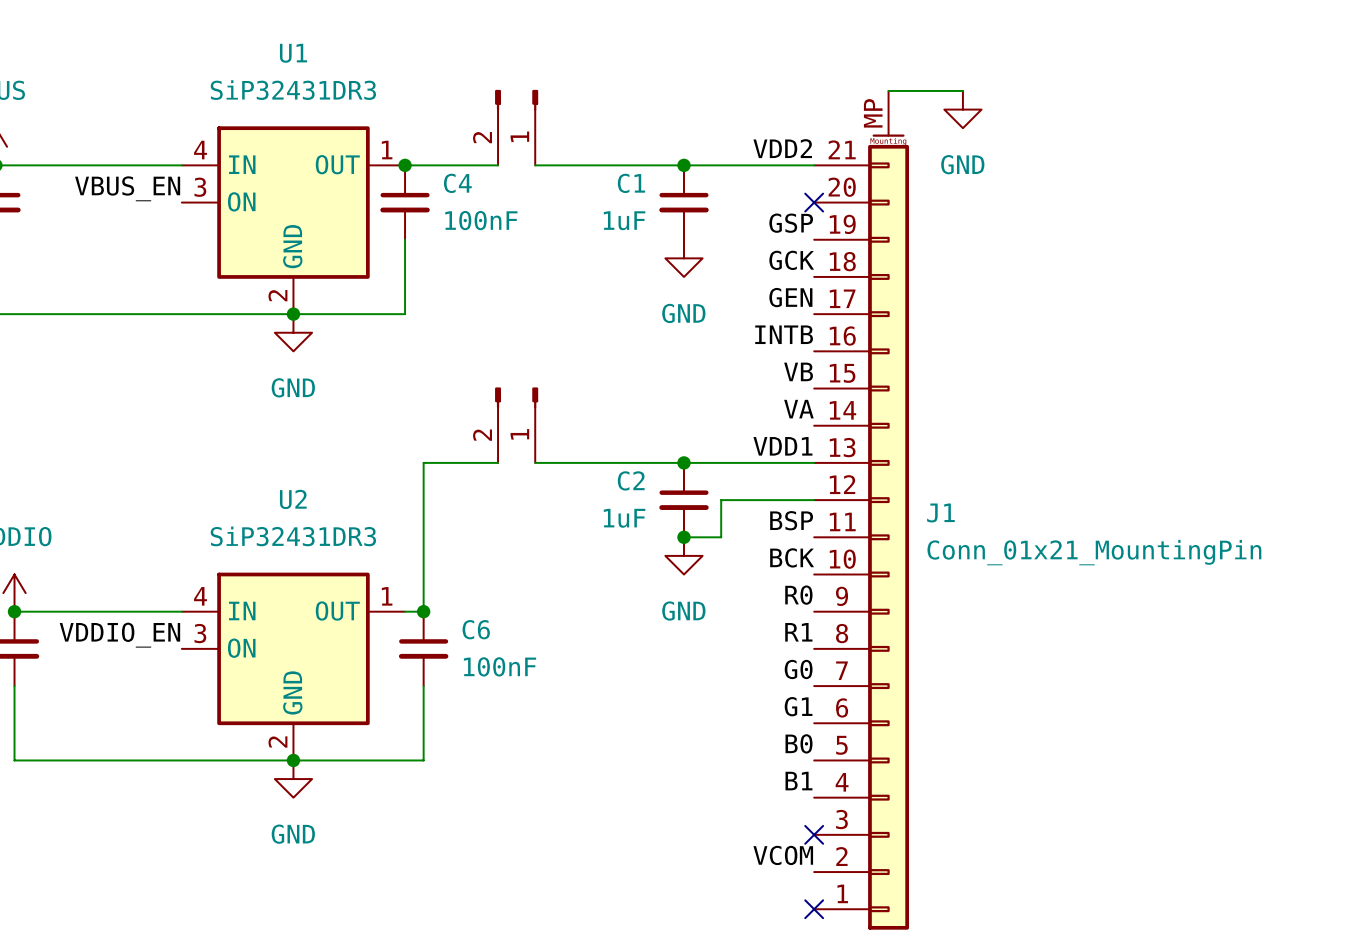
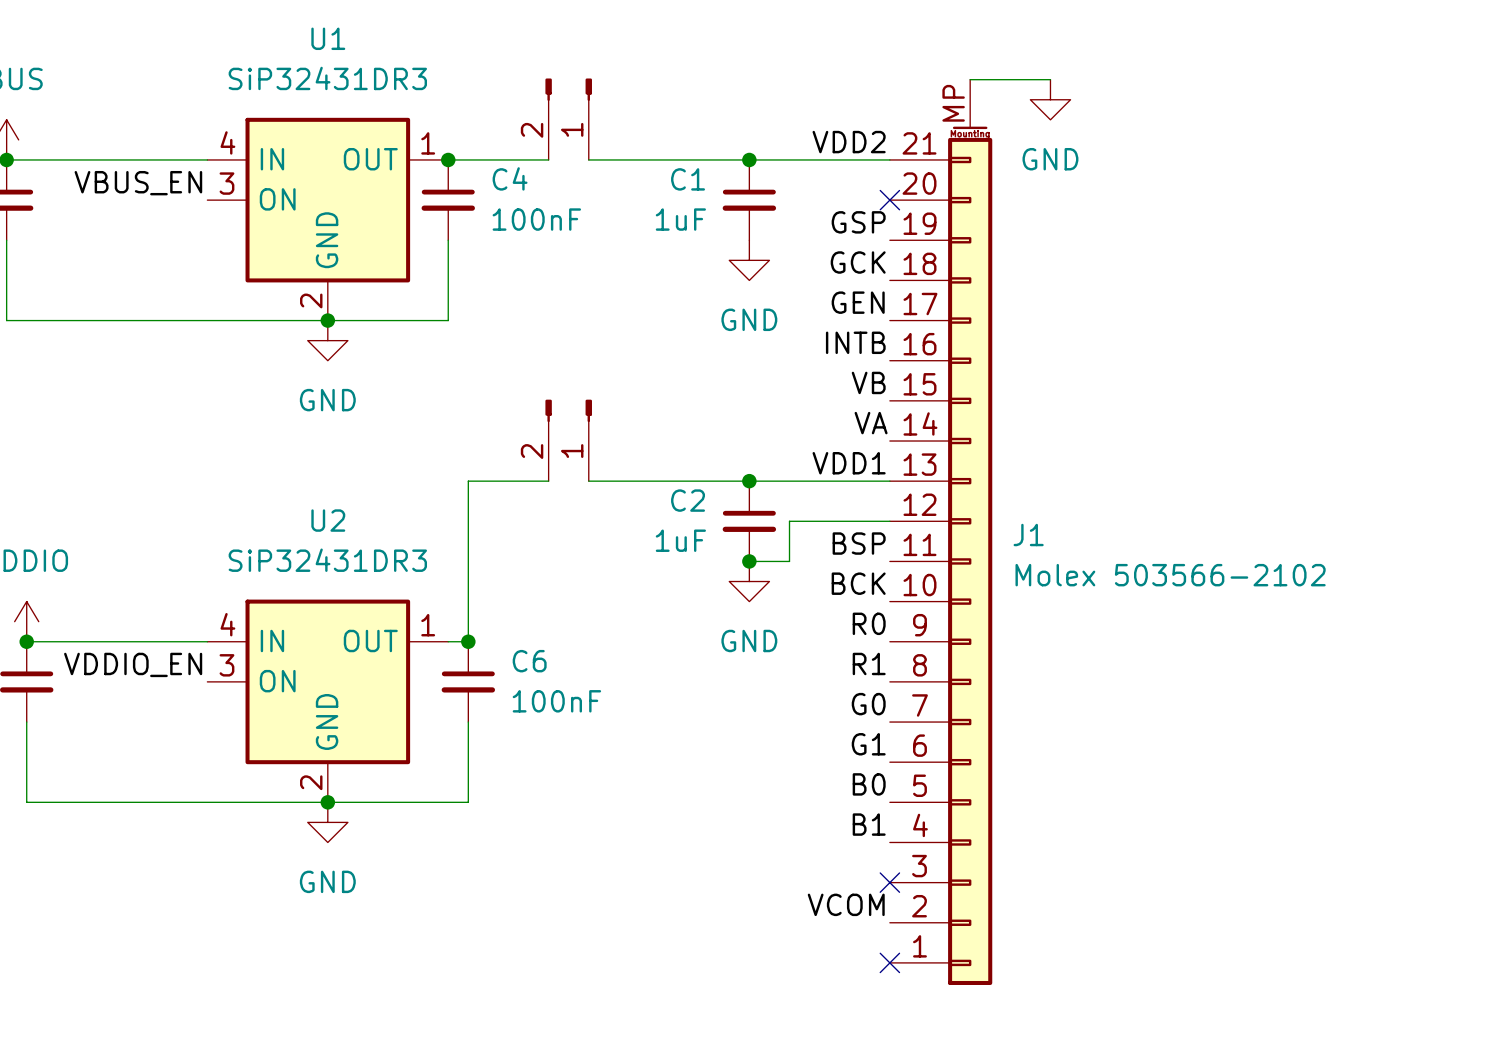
J1 value: Conn_01x21_MountingPin (1094, 552) -> Molex 503566-2102 (1170, 575)

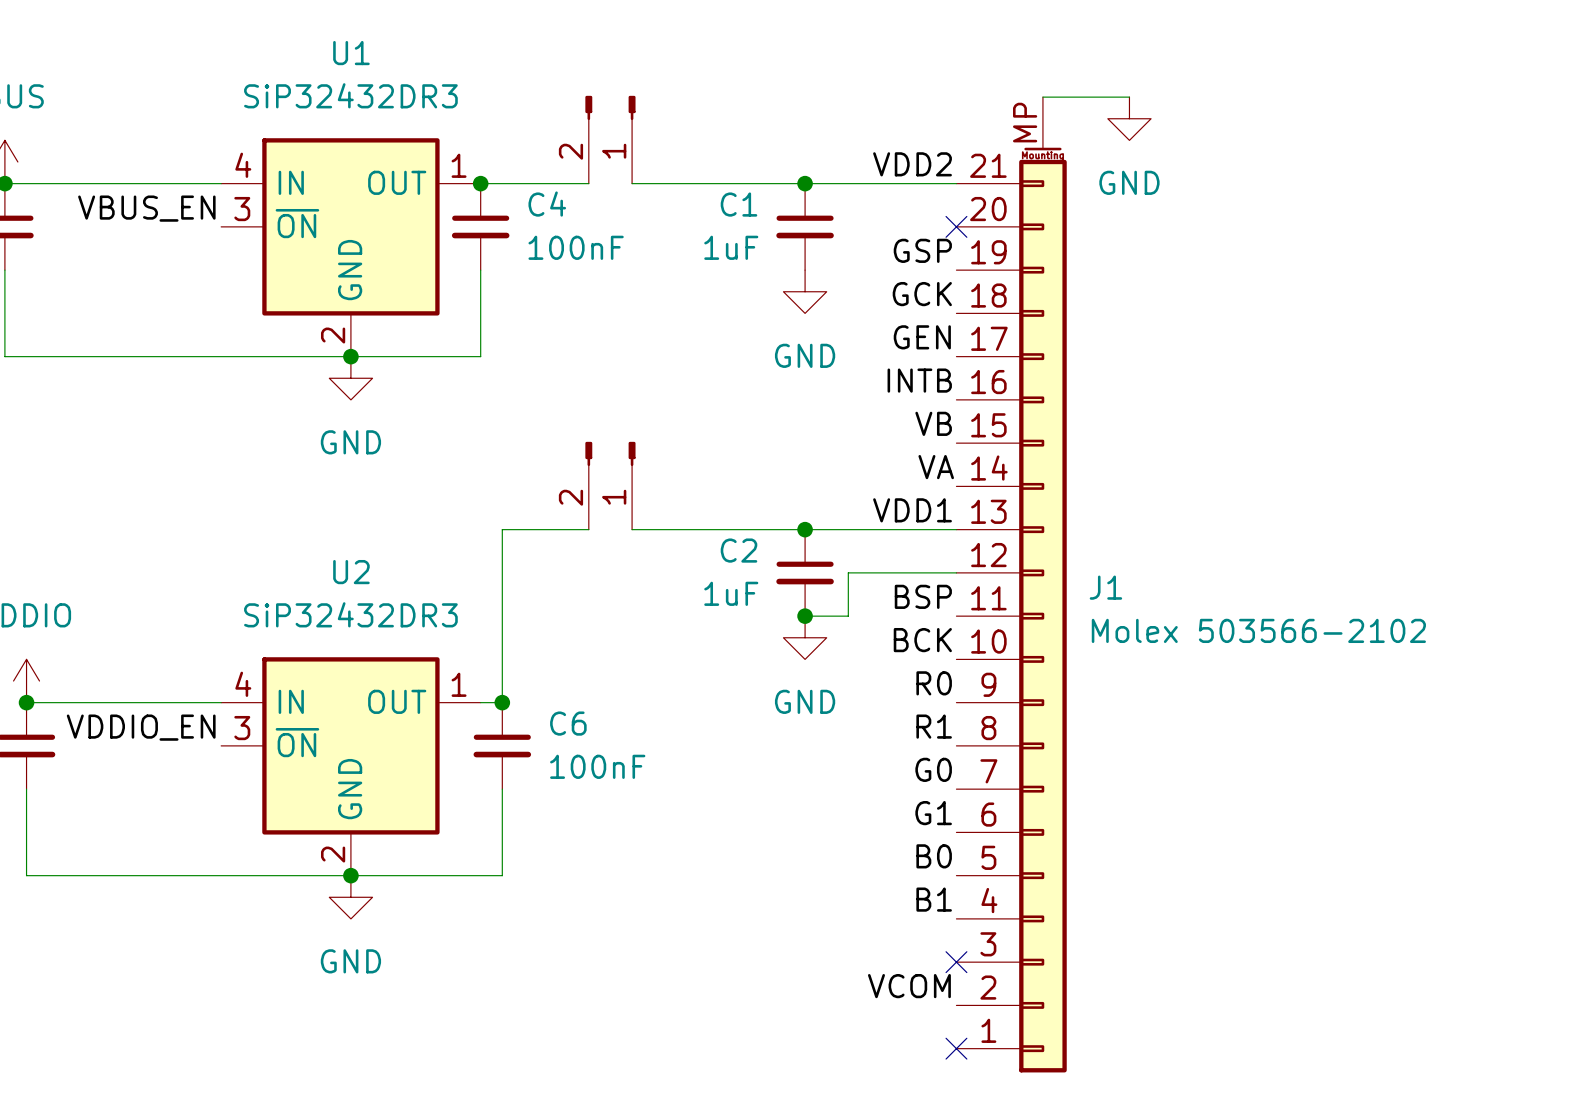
U1 value: SiP32431DR3 (327, 78) -> SiP32432DR3 (350, 95)
U1 pin name: ON (277, 199) -> ~{ON} (297, 223)
U2 value: SiP32431DR3 (327, 560) -> SiP32432DR3 (350, 614)
U2 pin name: ON (277, 681) -> ~{ON} (297, 742)

